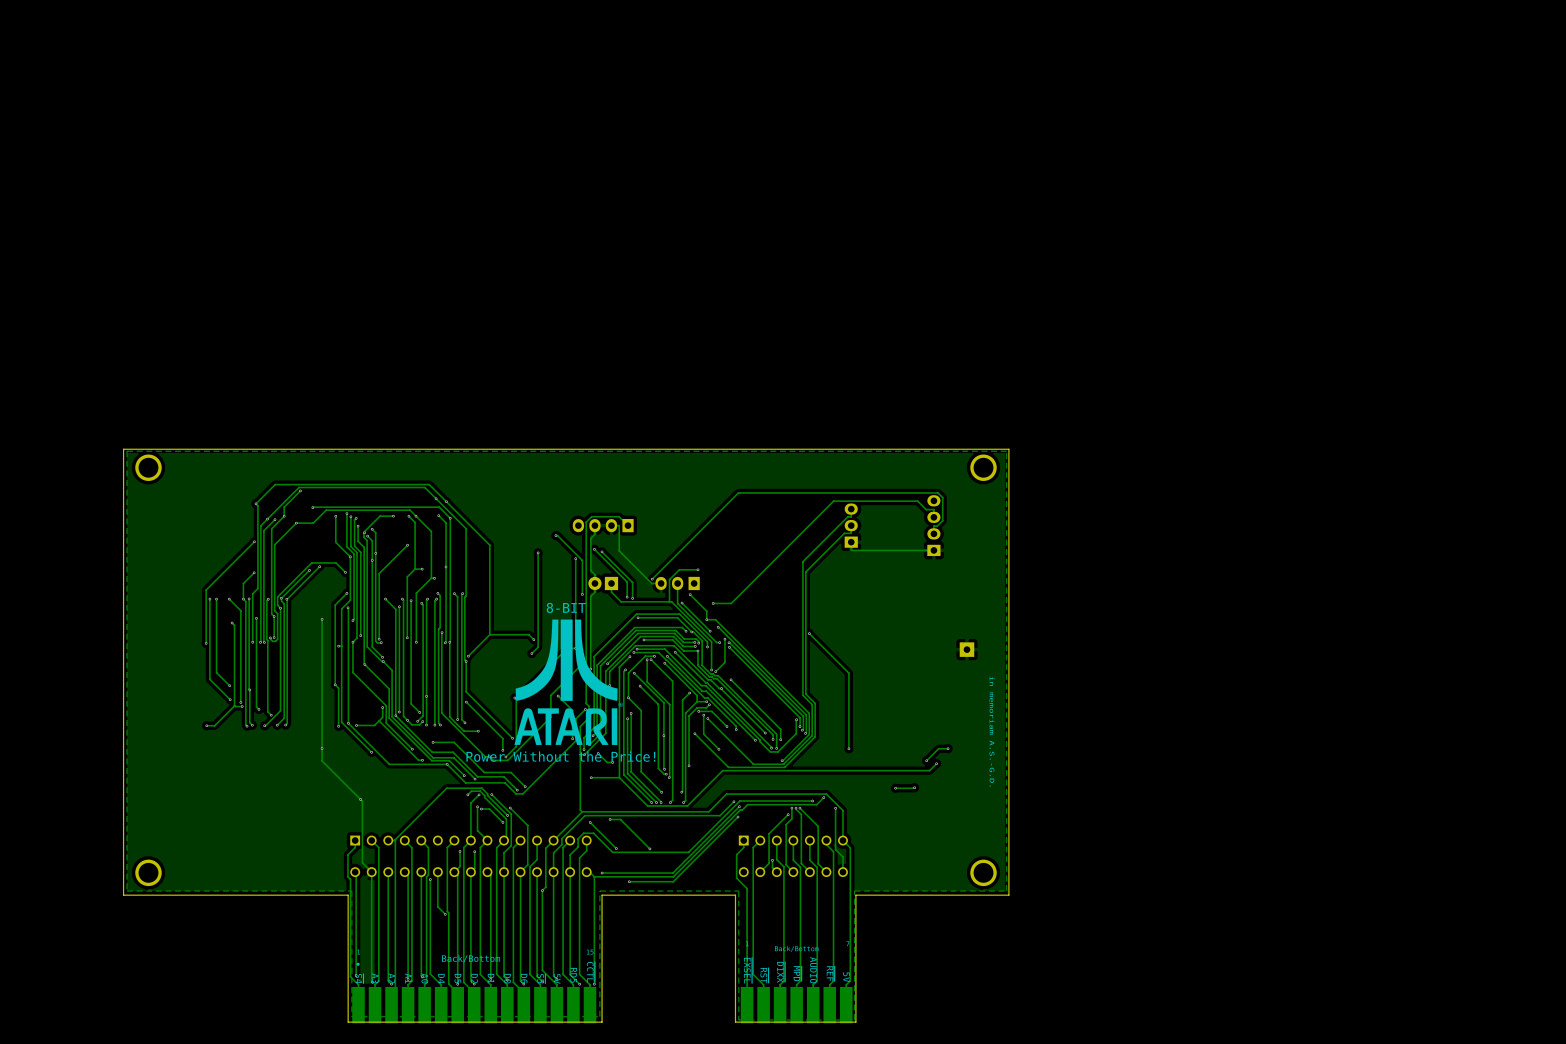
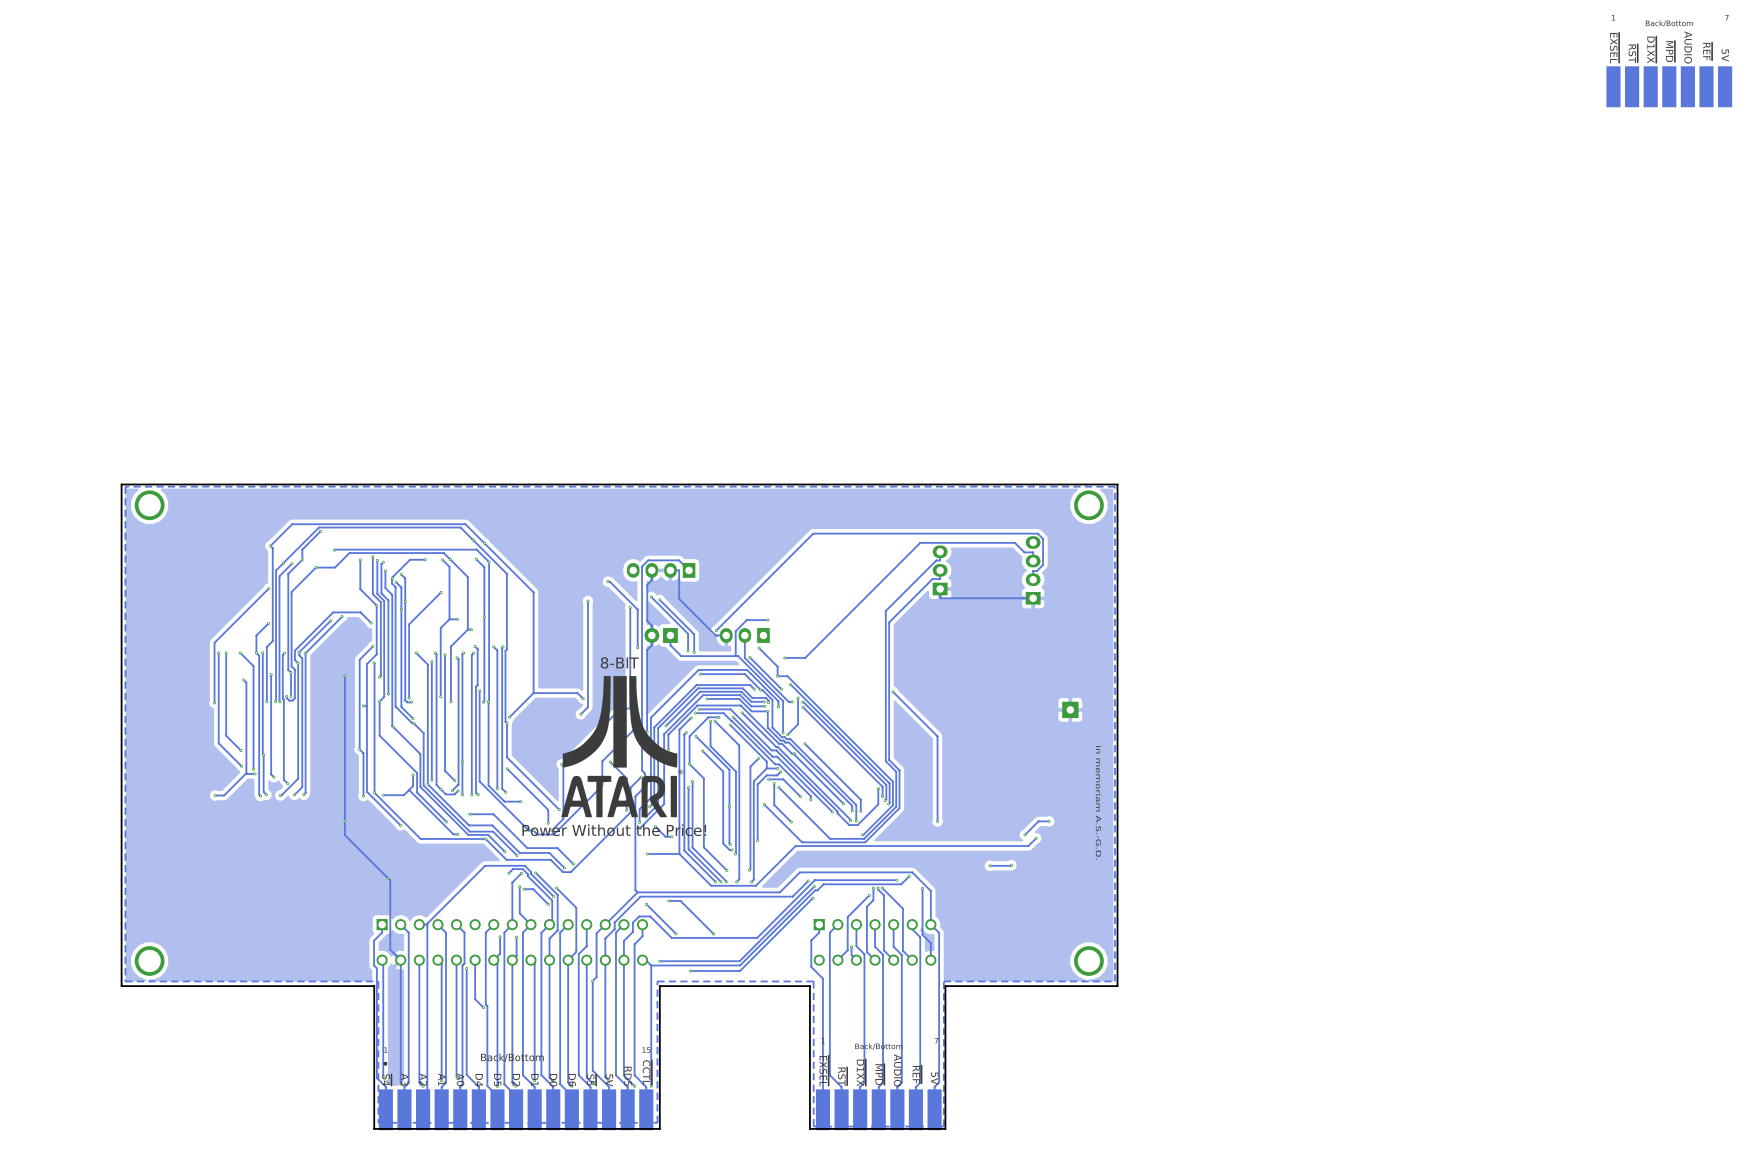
part: none -> (1669, 86)

